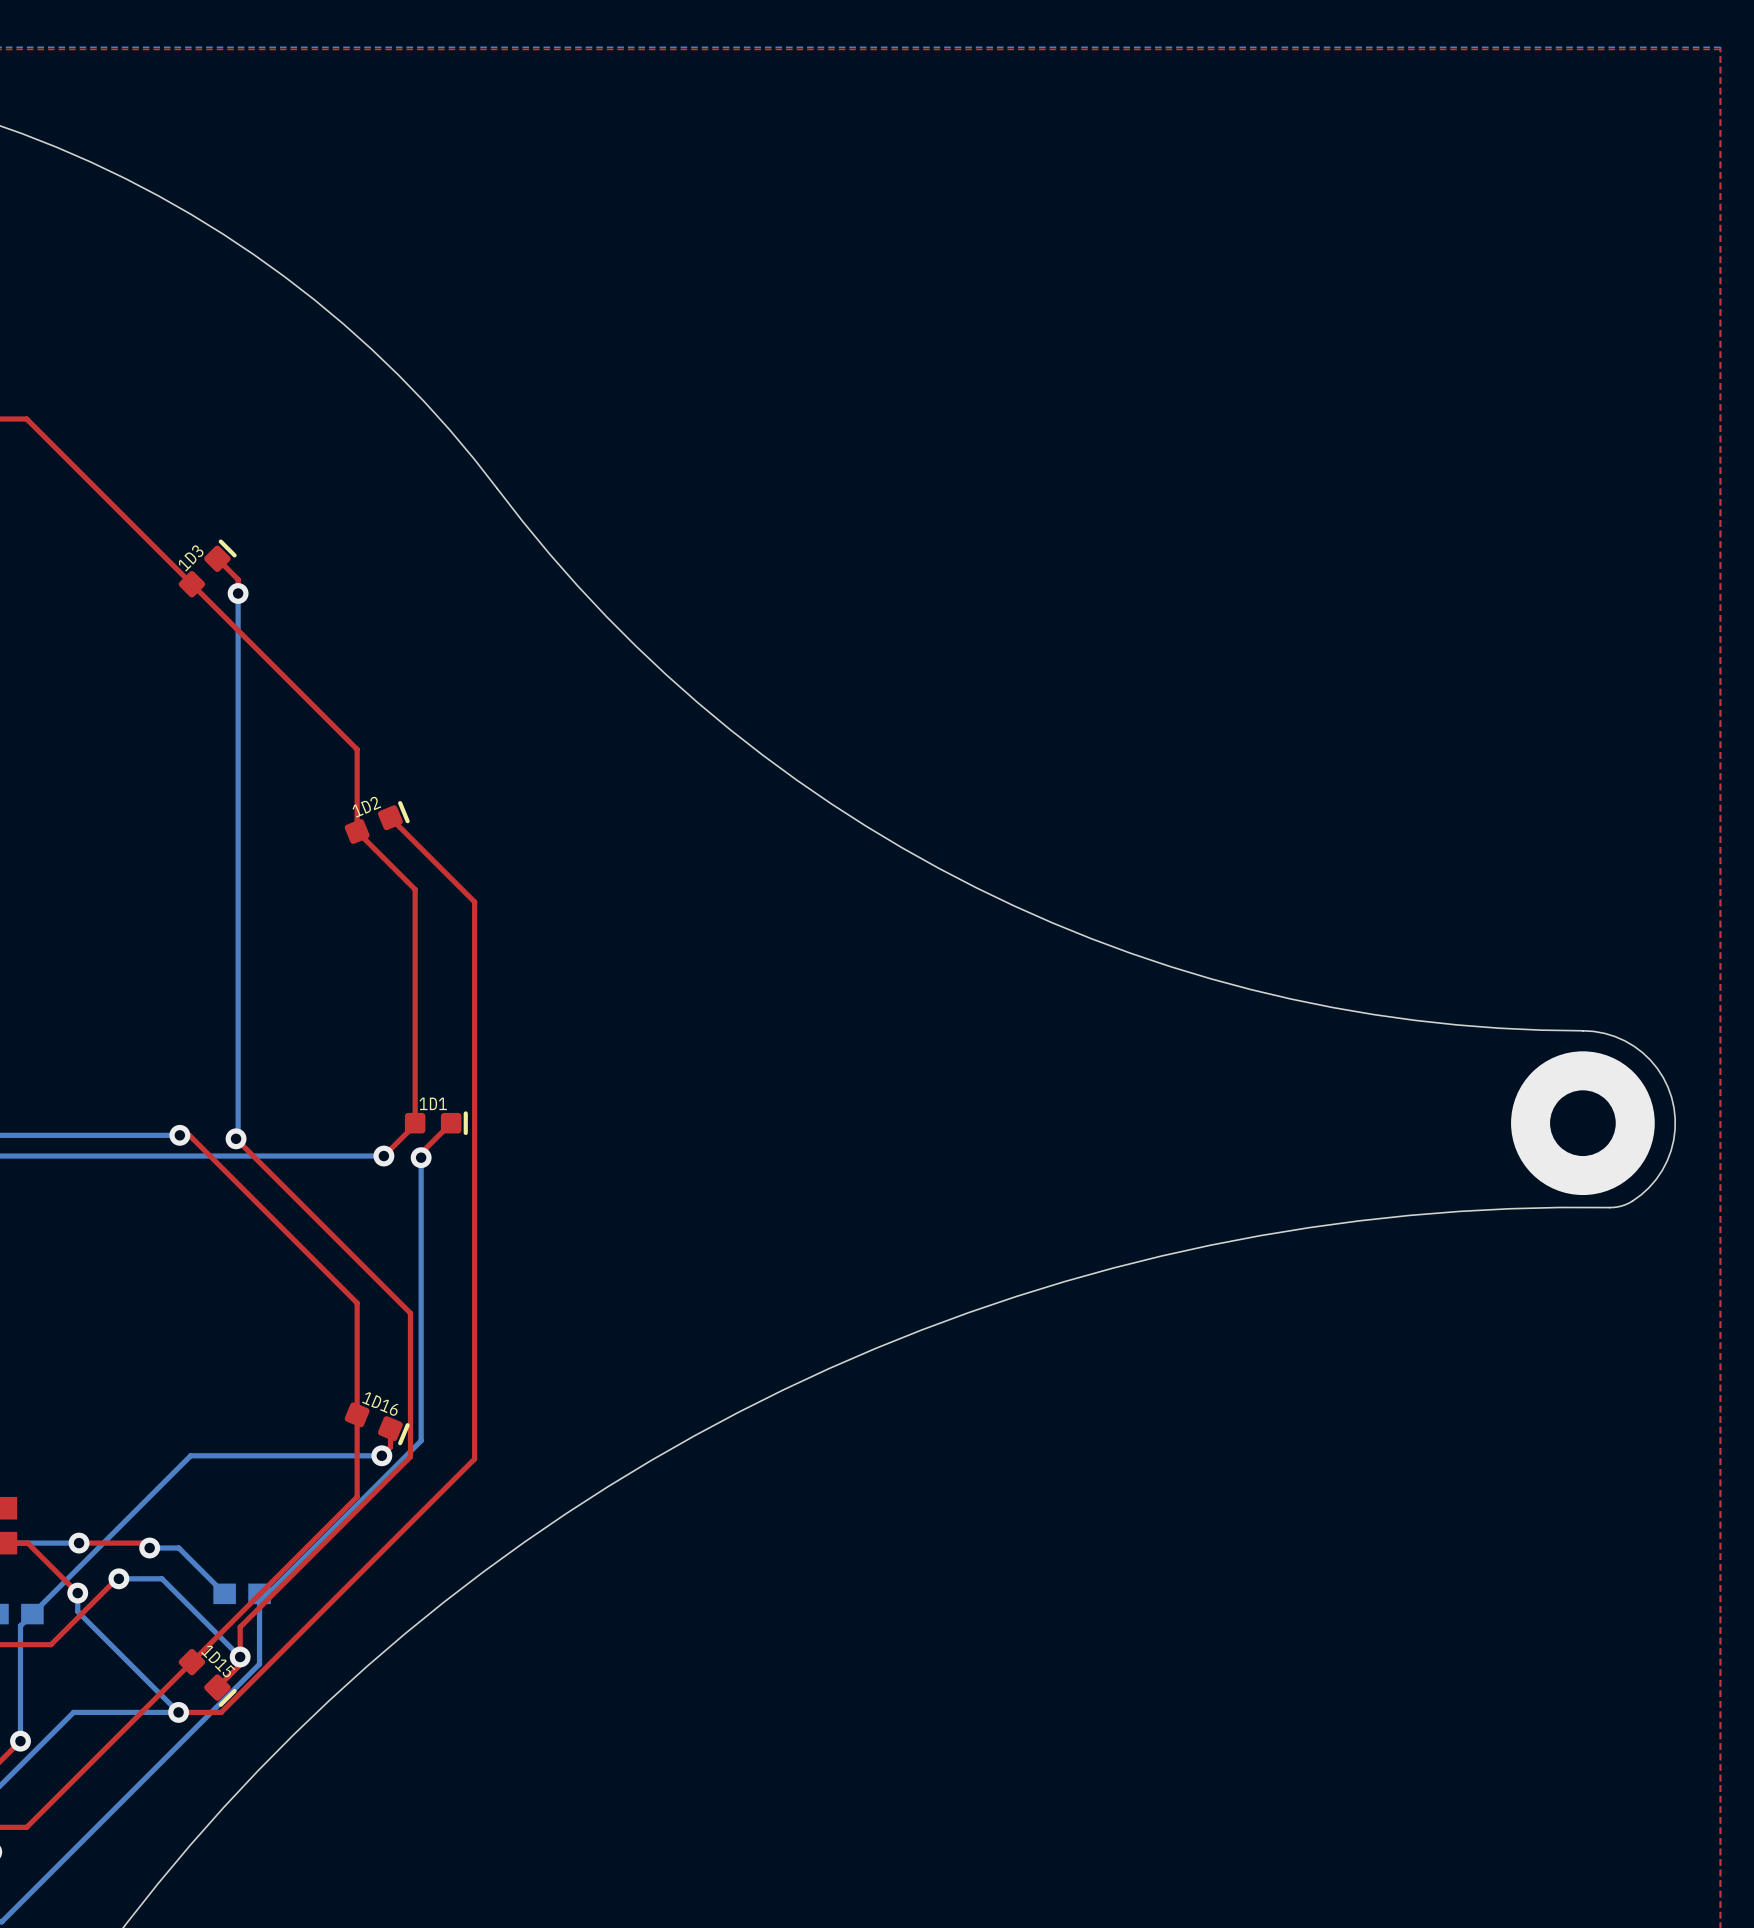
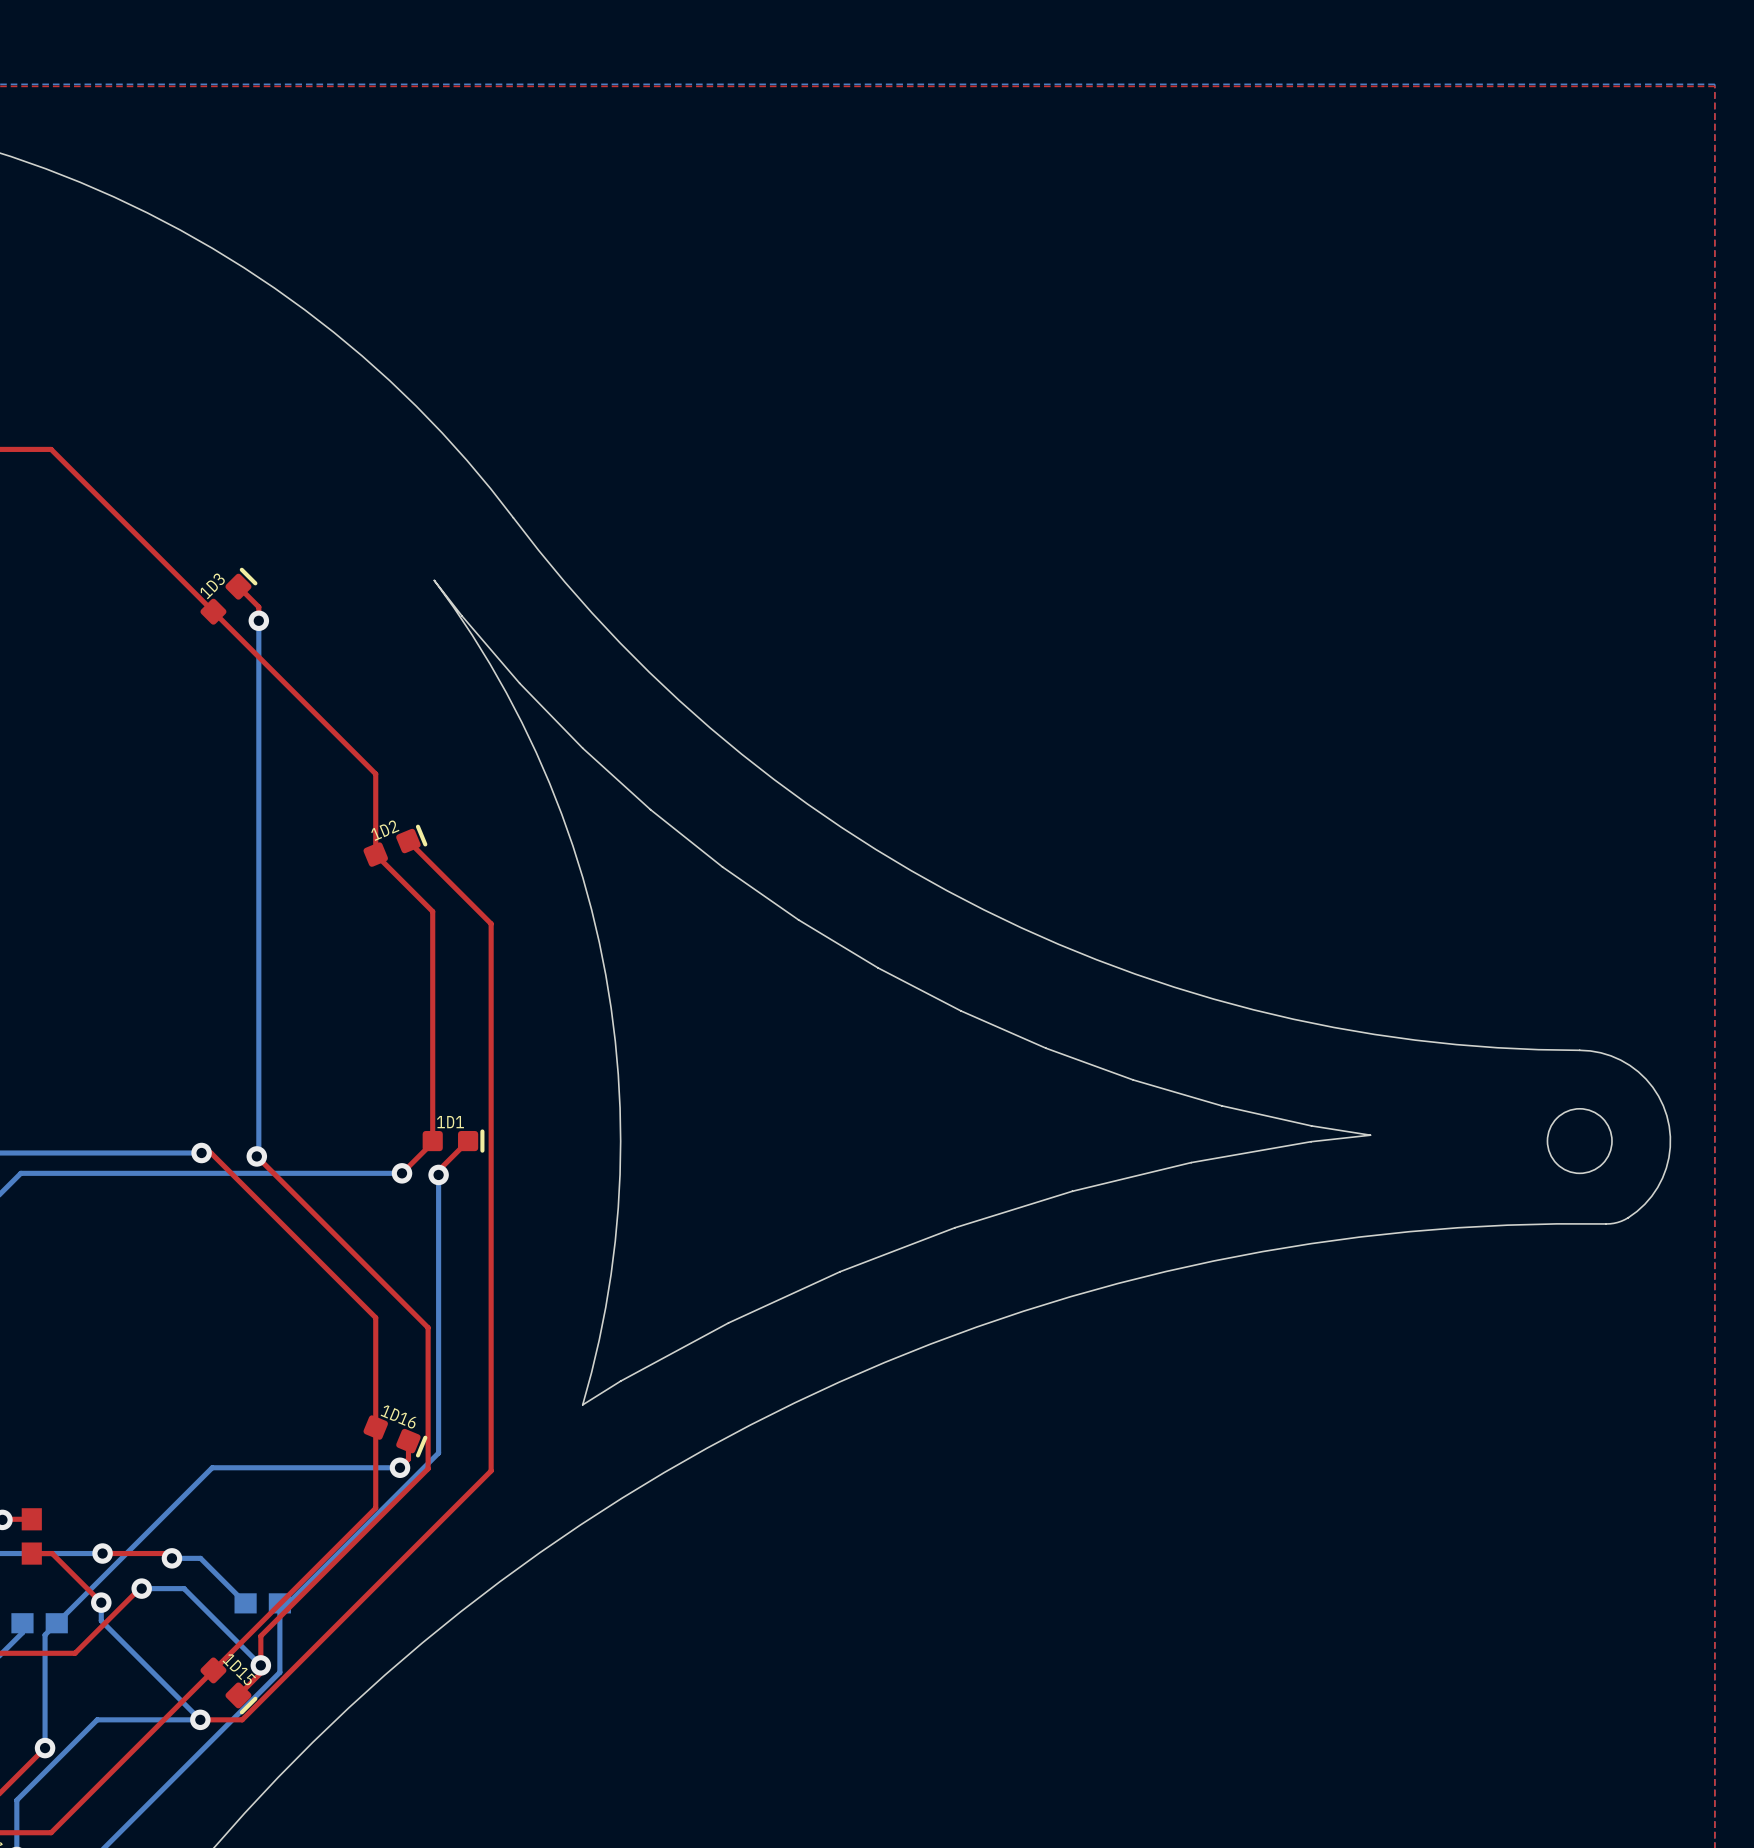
board edge: none -> (434, 580) (519, 683) (582, 748) (650, 809) (722, 866) (798, 919) (878, 967) (960, 1010) (1046, 1048) (1133, 1079) (1221, 1105) (1311, 1125) (1370, 1135) (1311, 1141) (1191, 1162) (1072, 1191) (955, 1227) (840, 1271) (728, 1322) (620, 1381) (582, 1404) (599, 1340) (611, 1274) (620, 1174) (618, 1074) (605, 975) (582, 877) (549, 783) (521, 722) (489, 663) (434, 580)
round board edge: none -> [1547, 1108, 1613, 1174]
via: (1582, 1123) -> none

